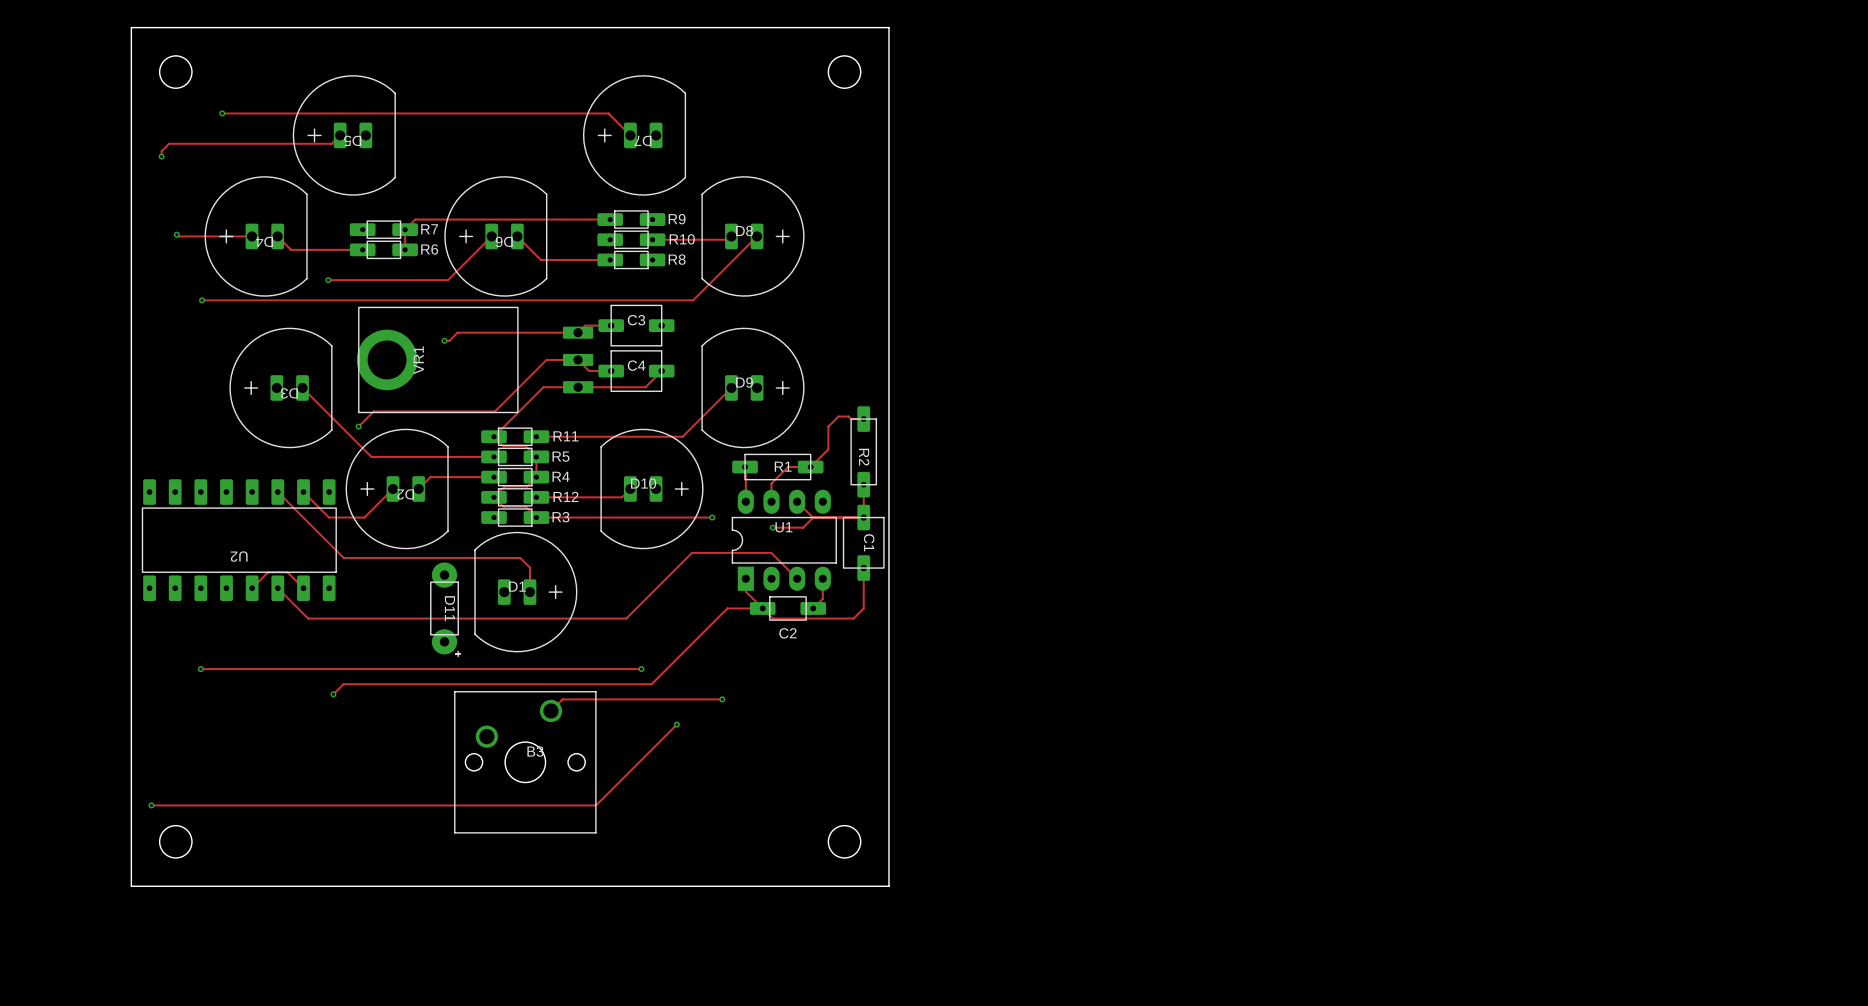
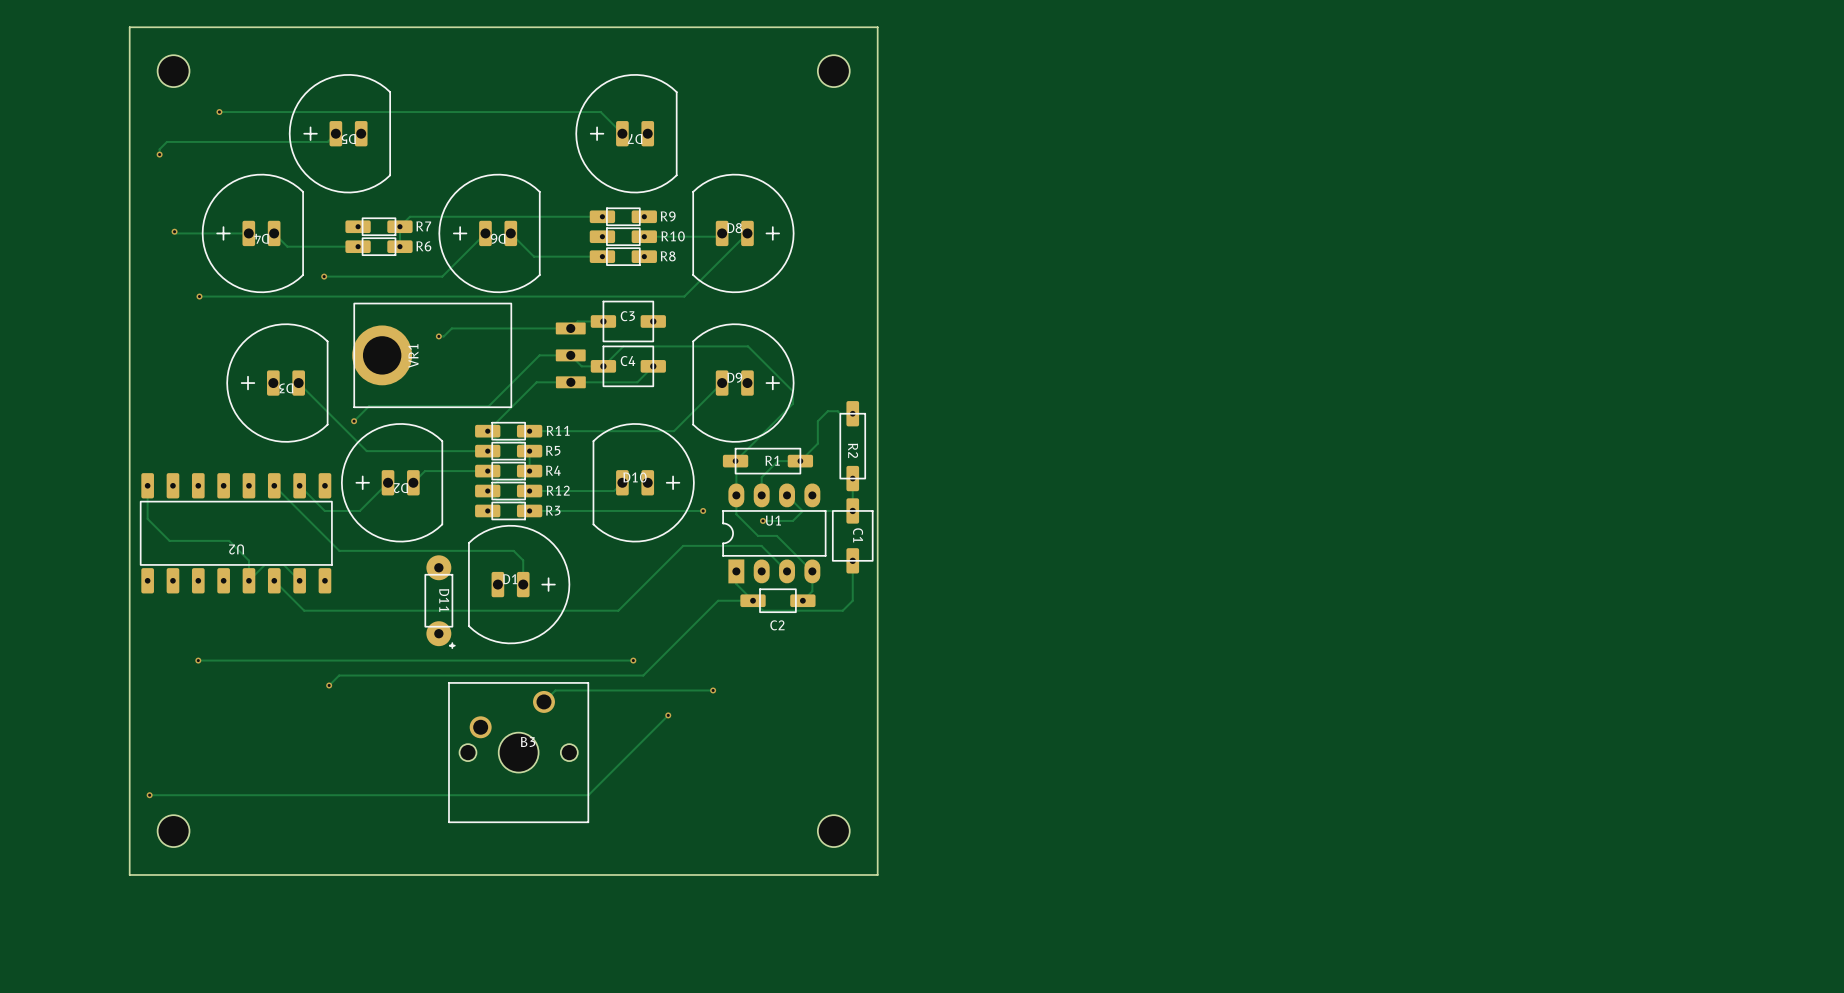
track: none -> (603, 366) (623, 346) (748, 346) (792, 391) (792, 403) (735, 461)
track: none -> (147, 485) (147, 518) (169, 540) (229, 540) (248, 560) (248, 580)
track: none -> (736, 495) (736, 514) (758, 535) (776, 535) (812, 571)

